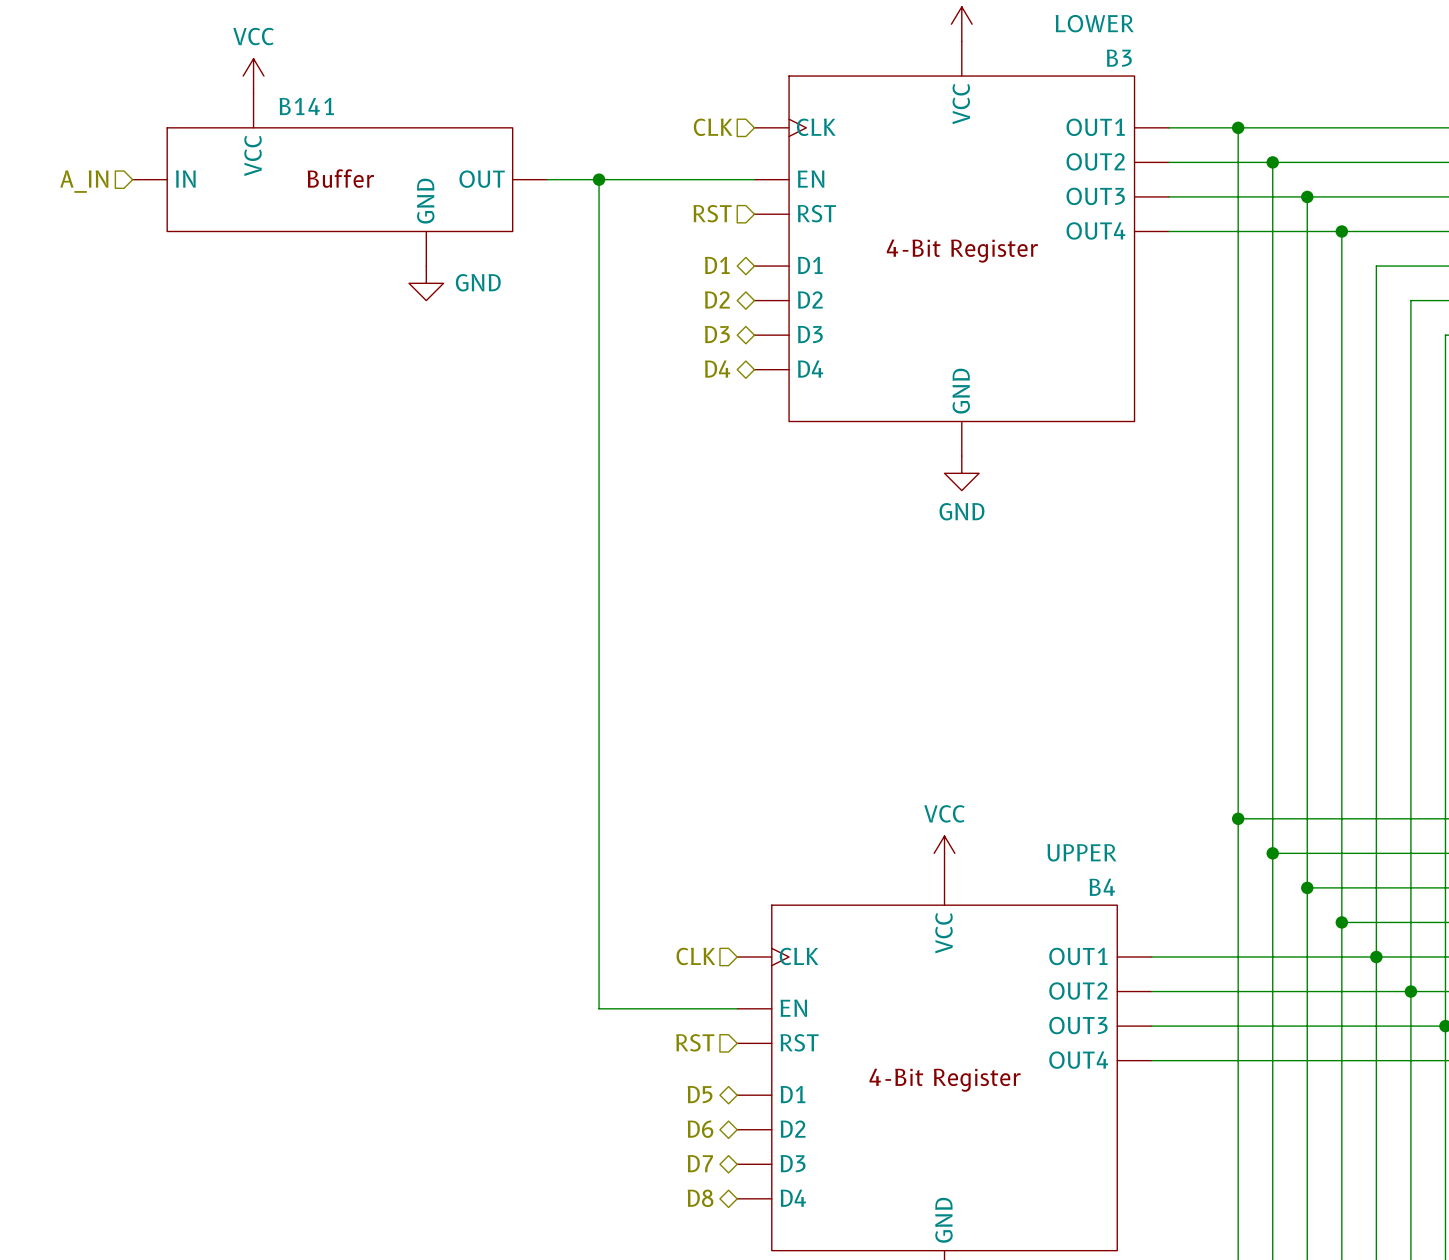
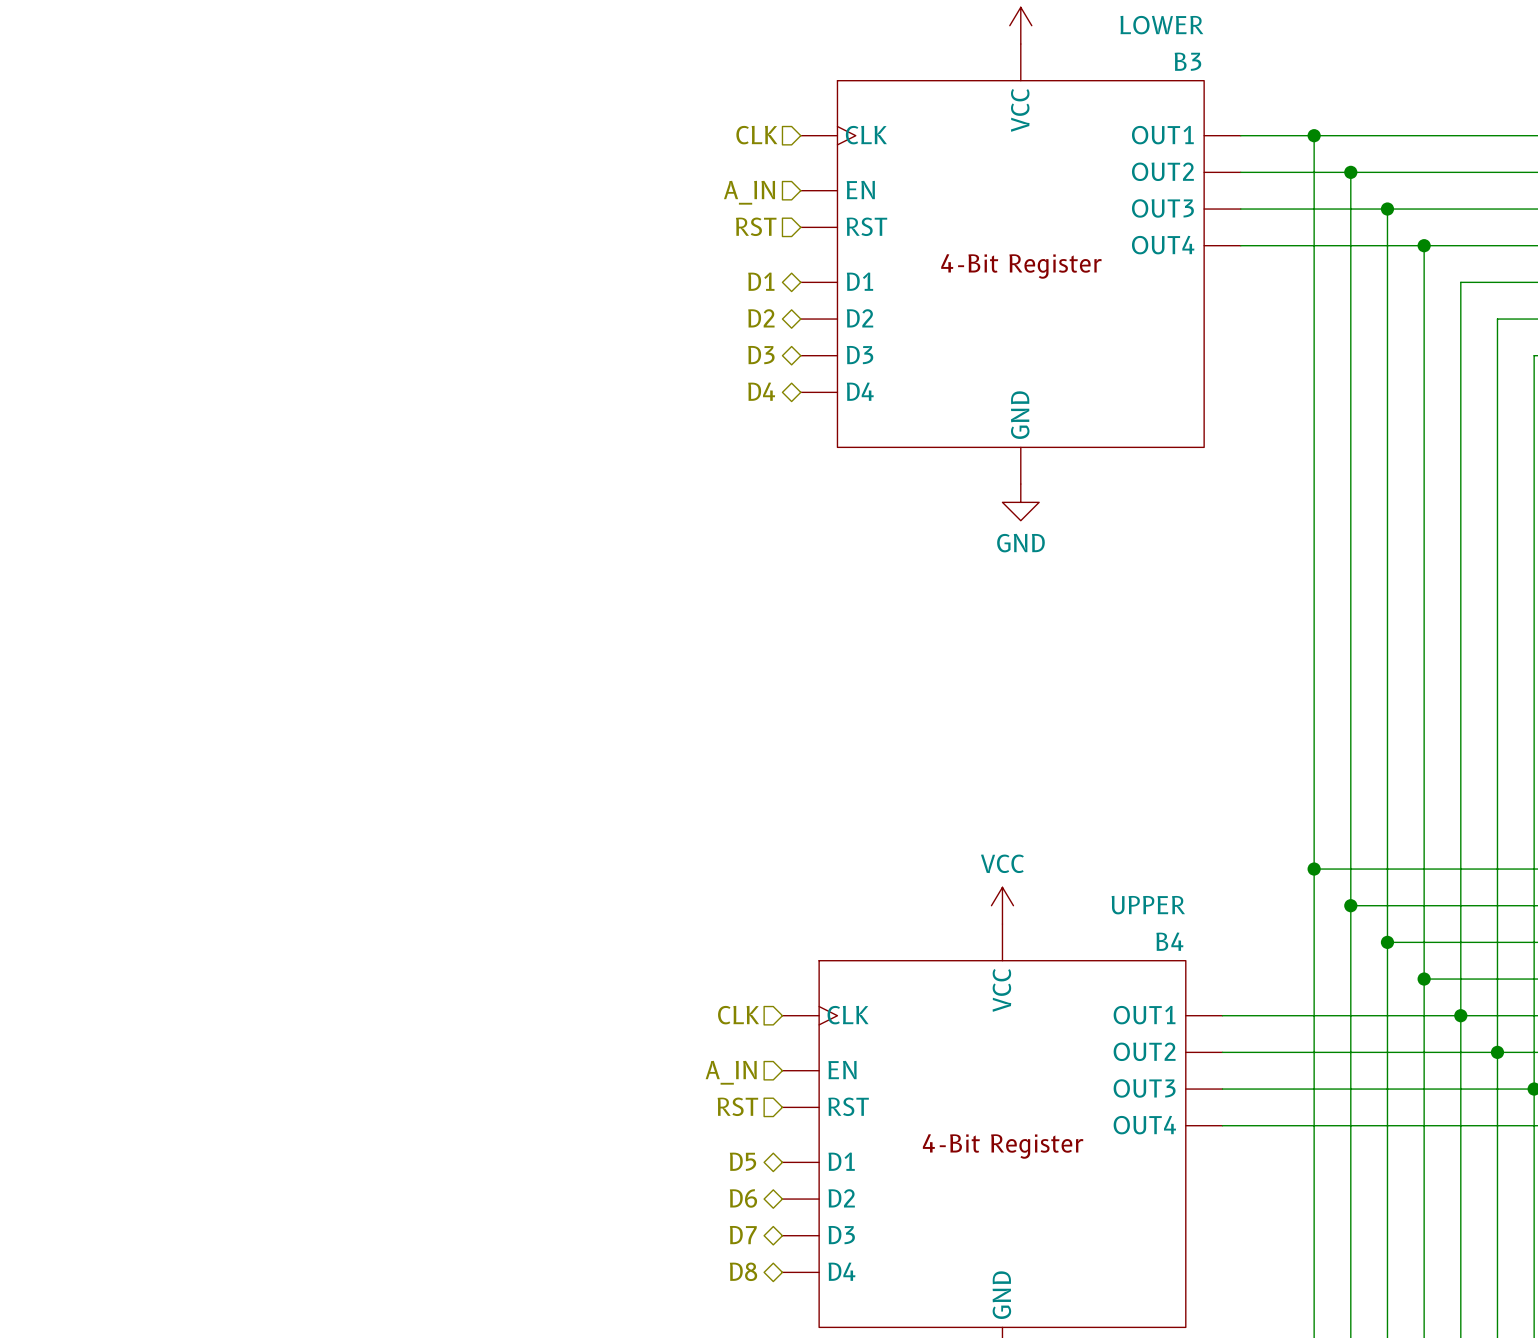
power symbol: VCC (253, 76) -> none
B141: (339, 179) -> none
wire: (547, 179) (754, 179) -> none
wire: (599, 179) (599, 1008) (737, 1008) -> none
junction: (599, 179) -> none
hierarchical label: A_IN (84, 181) -> none
hierarchical label: none -> A_IN (749, 192)
power symbol: GND (426, 283) -> none
hierarchical label: none -> A_IN (731, 1072)

